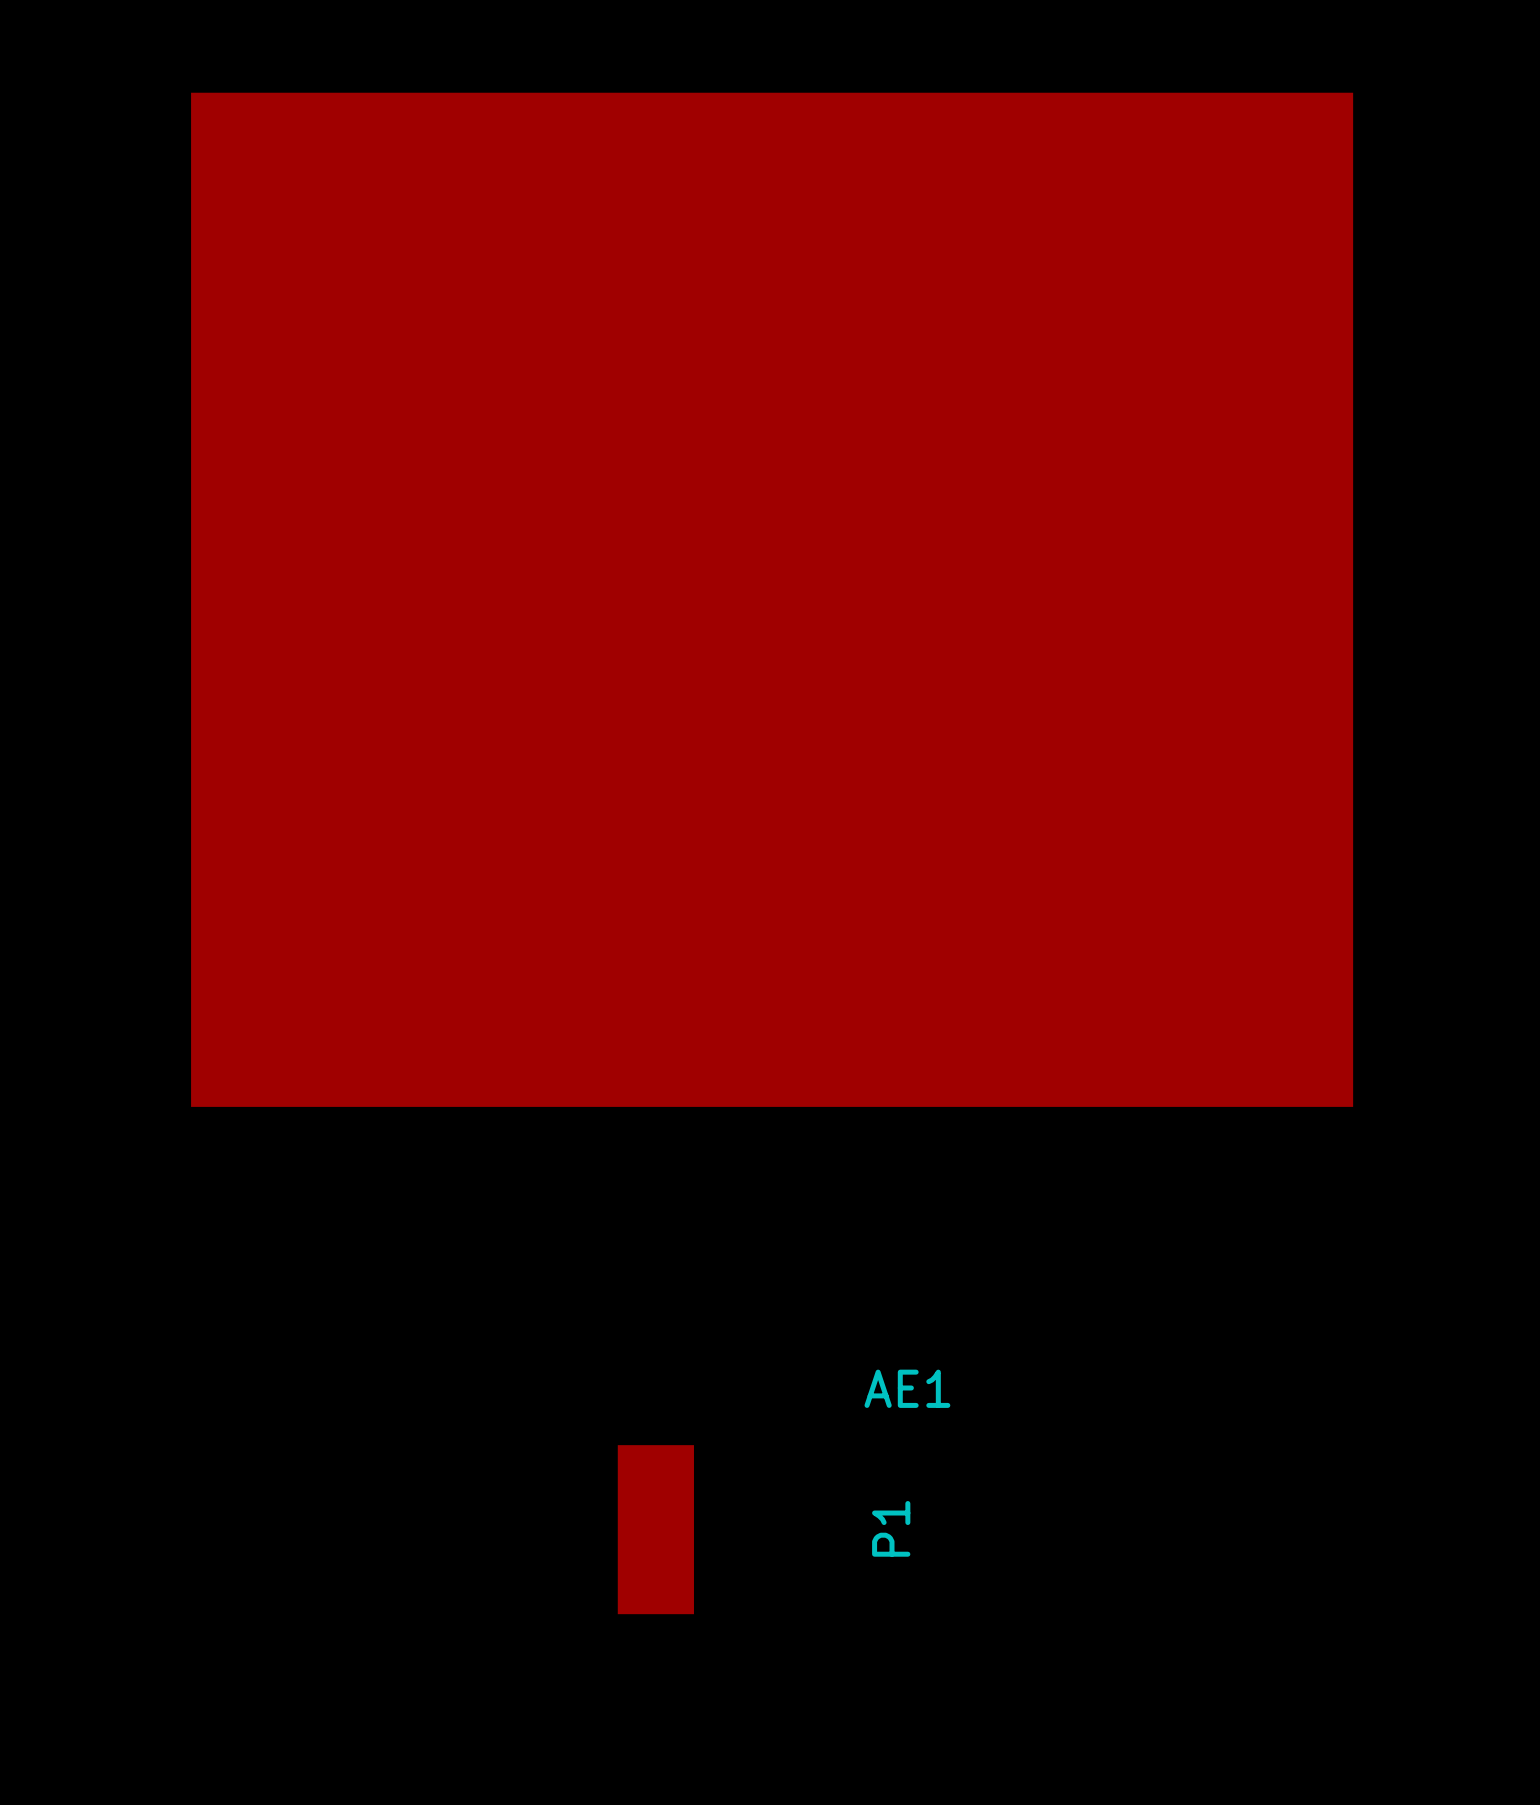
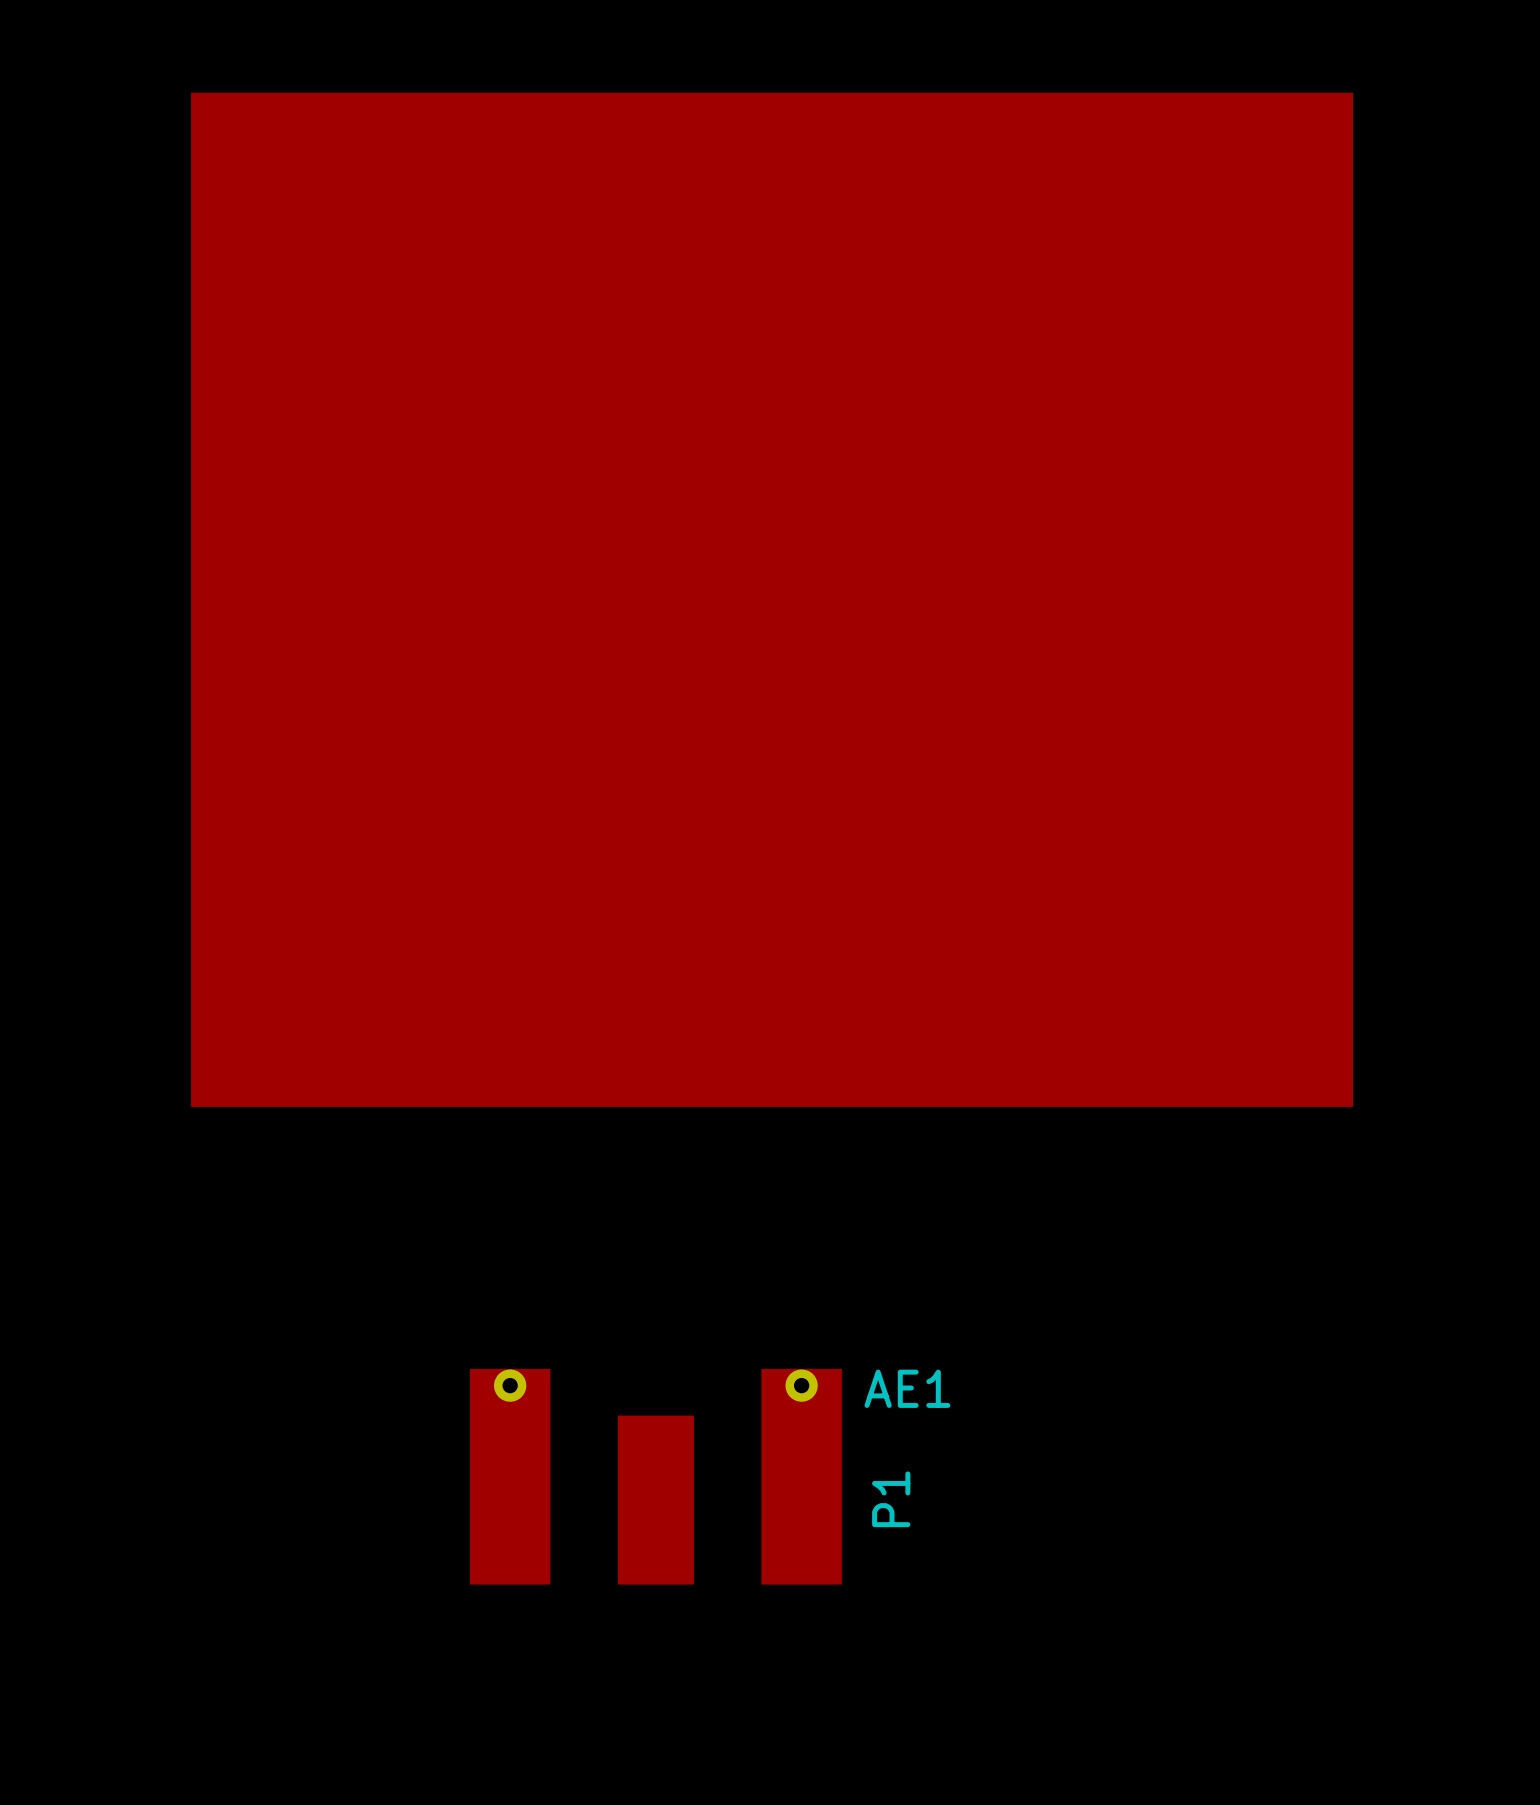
P1 footprint: [617, 1445, 694, 1615] -> [469, 1368, 842, 1585]

